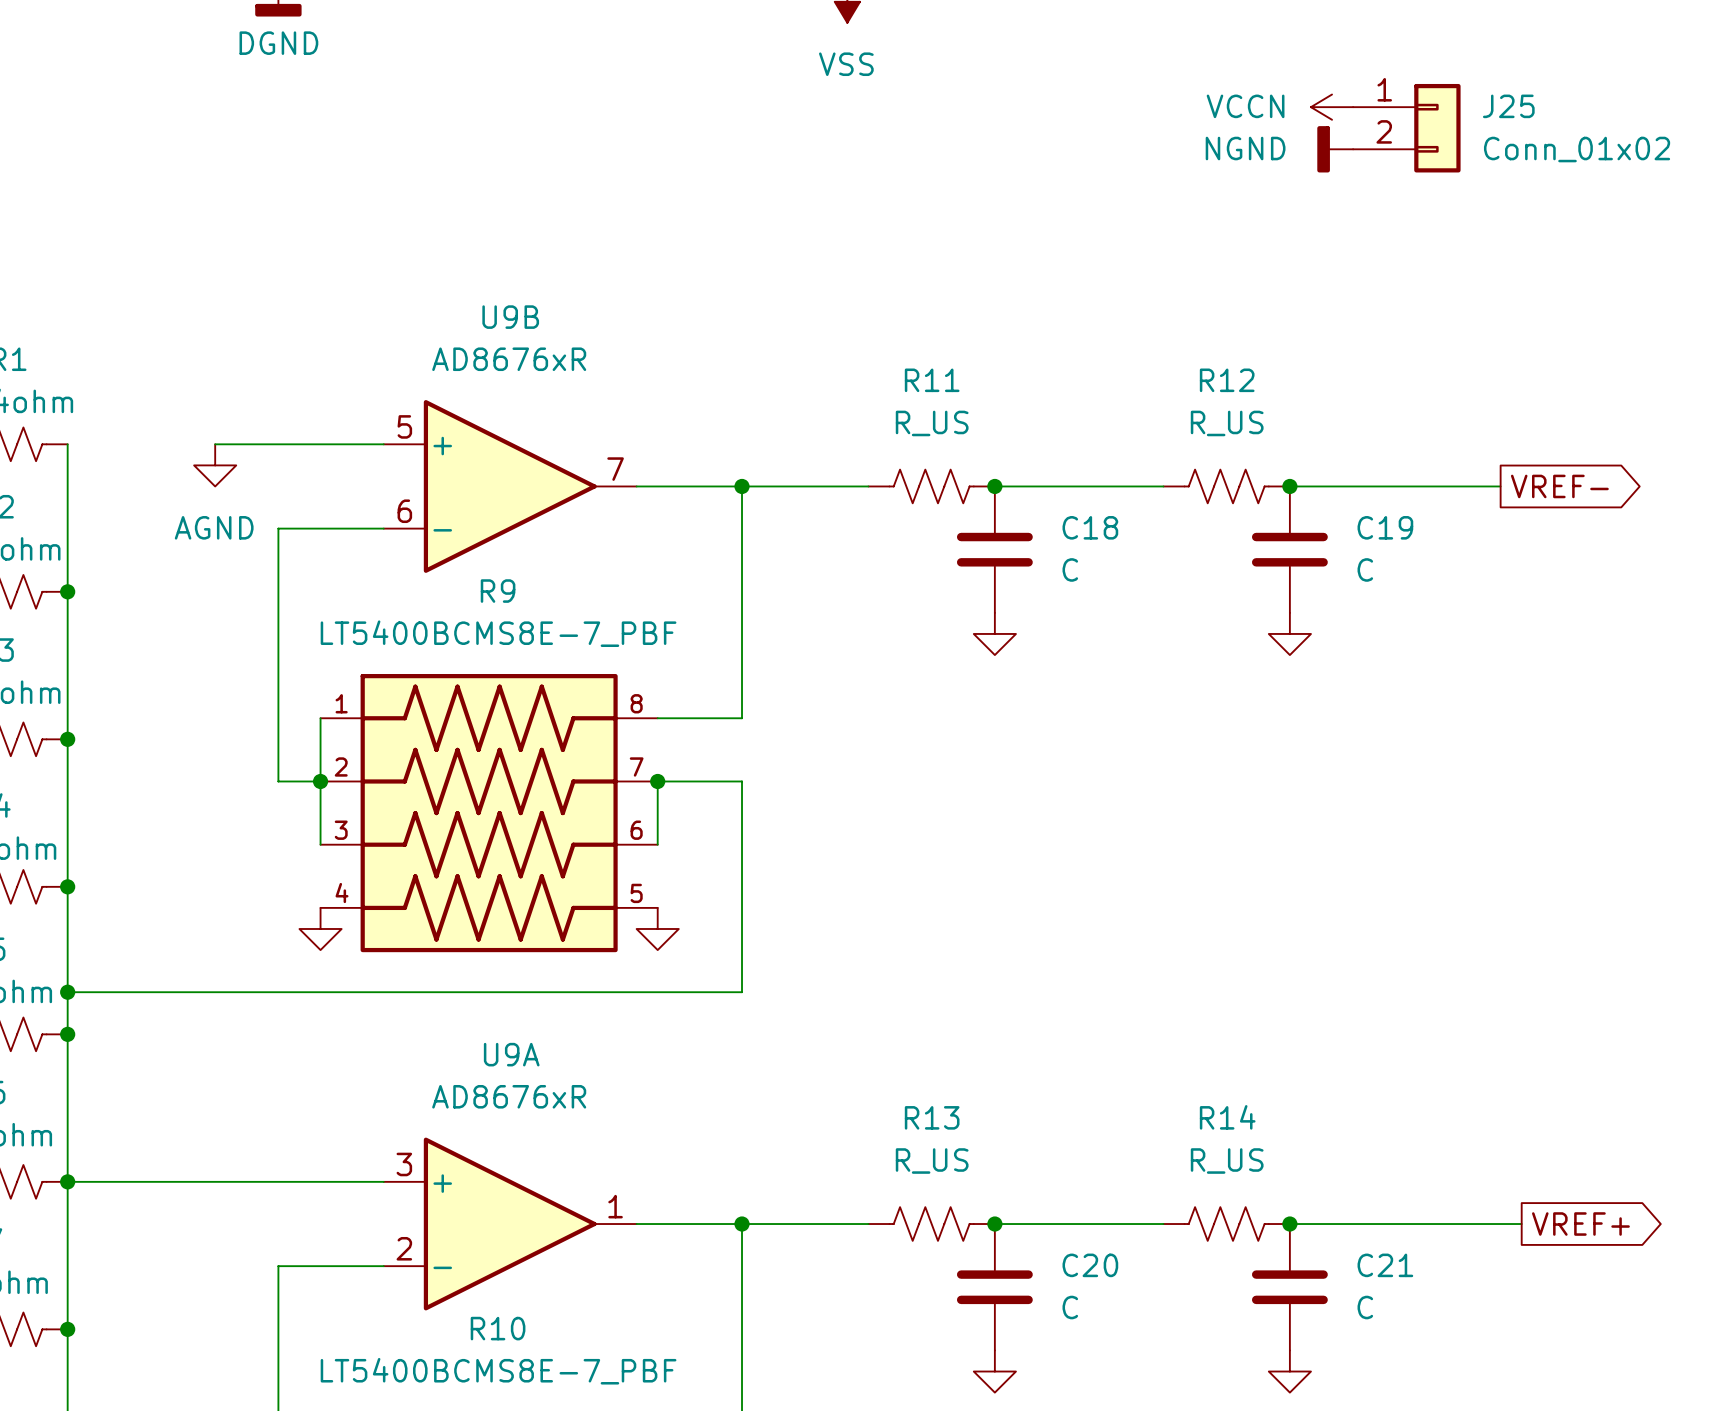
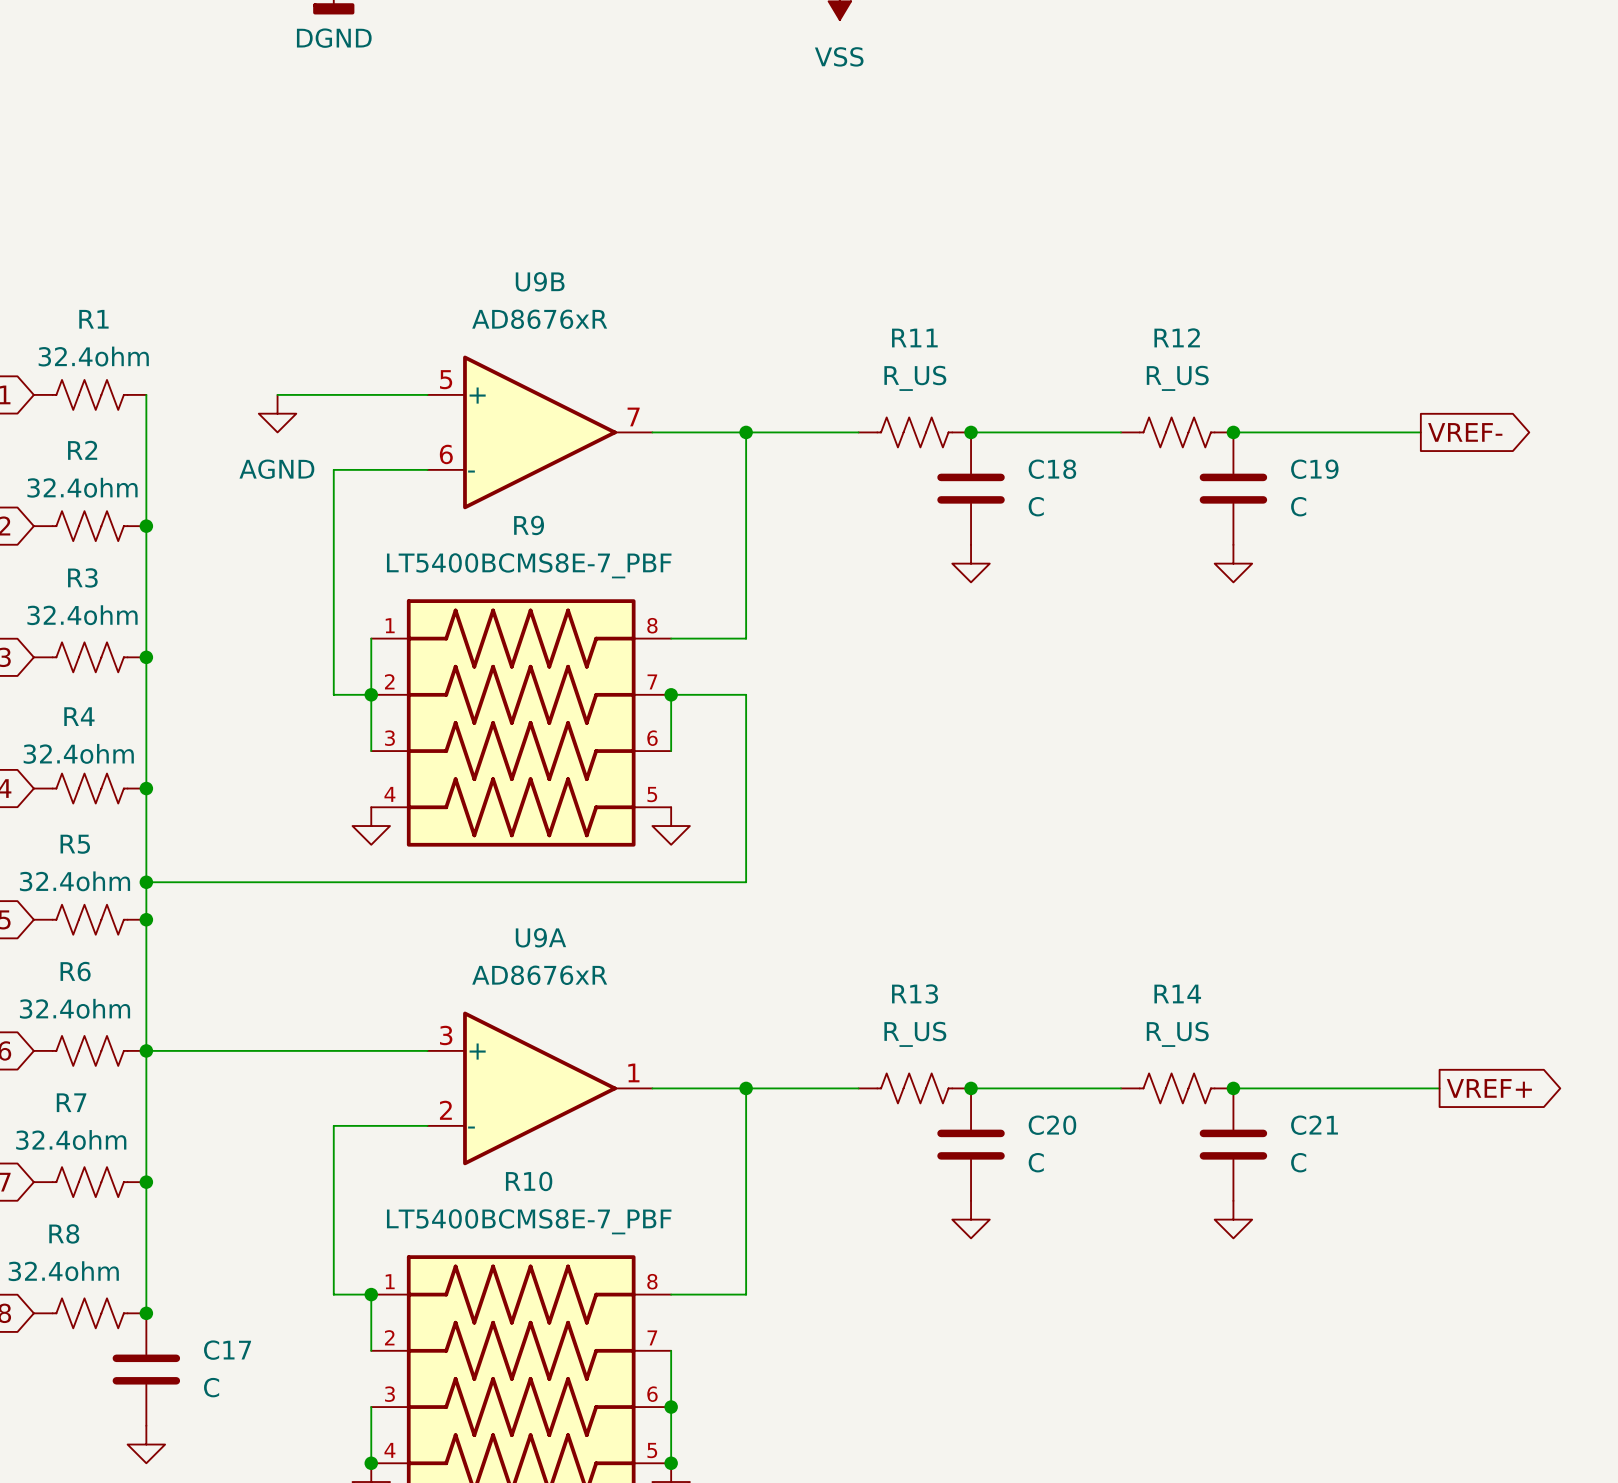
power symbol: VCCN (1332, 107) -> none
J25: Conn_01x02 (1406, 128) -> none
power symbol: NGND (1335, 149) -> none

